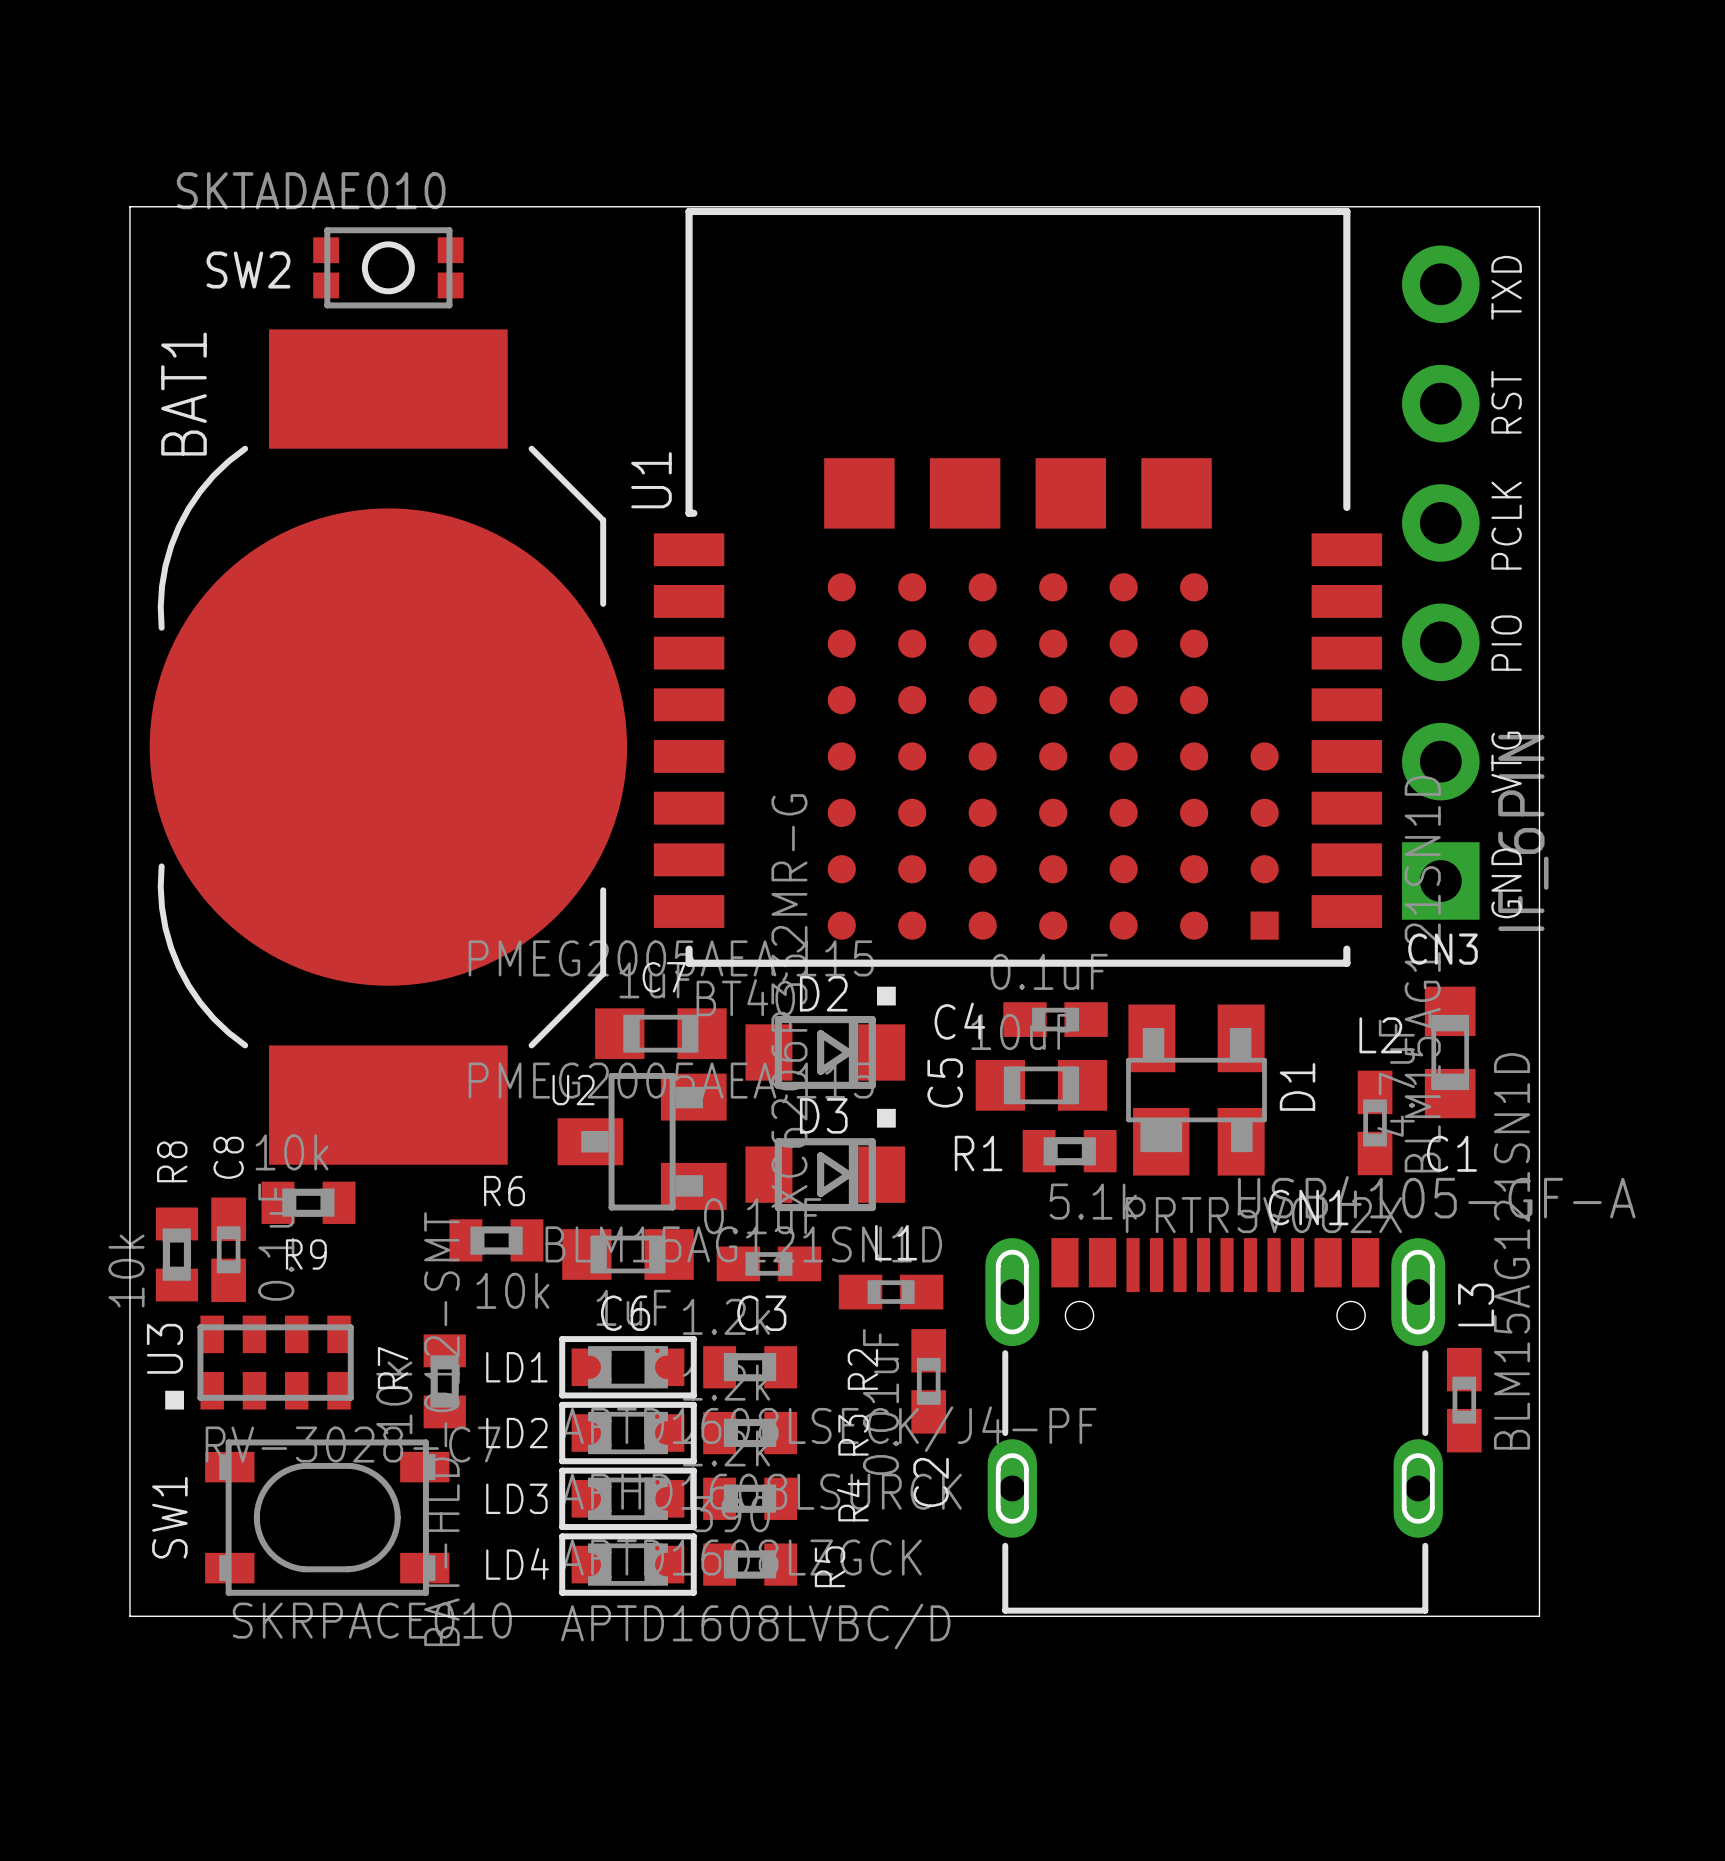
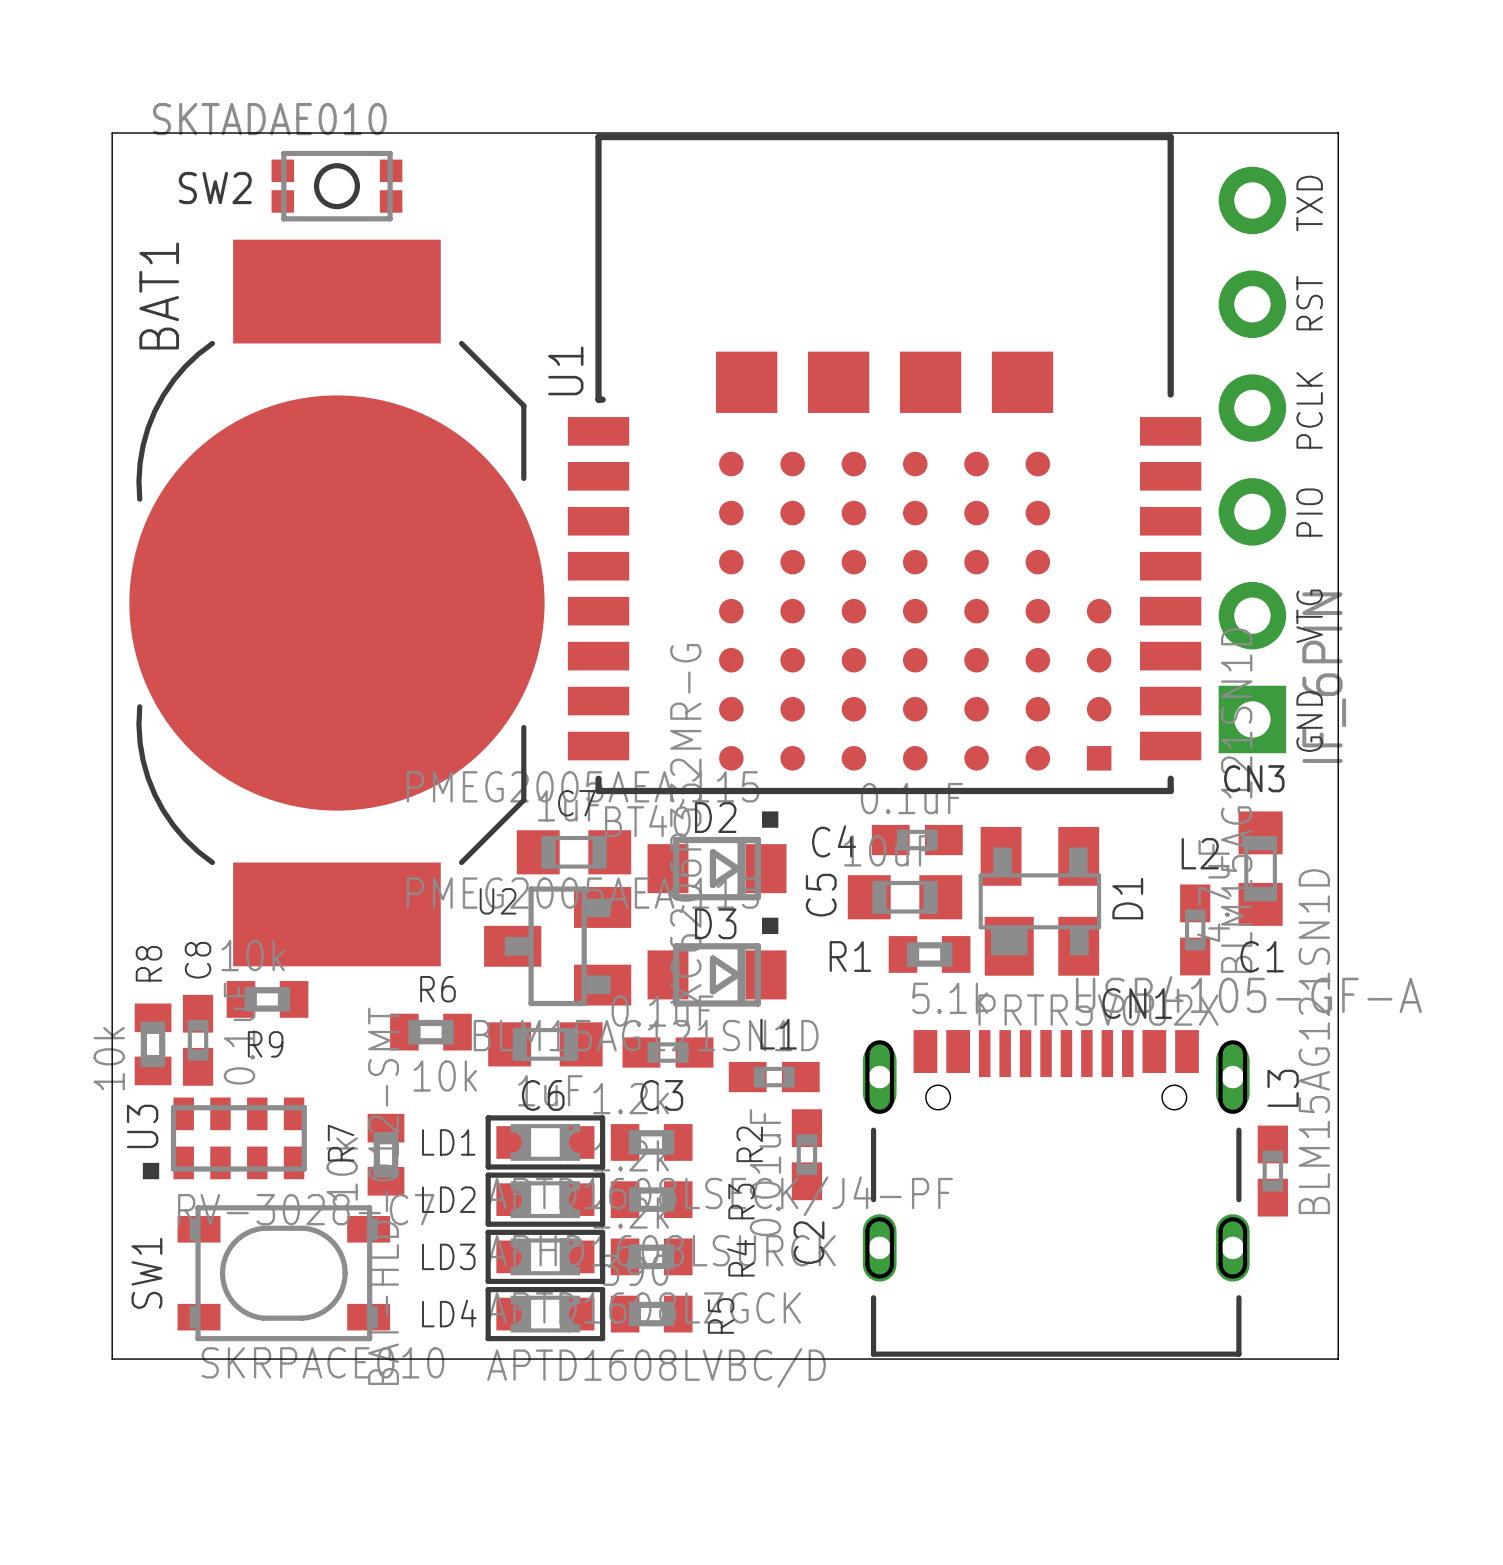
CN1 footprint: [985, 1238, 1446, 1614] -> [862, 1030, 1250, 1357]

